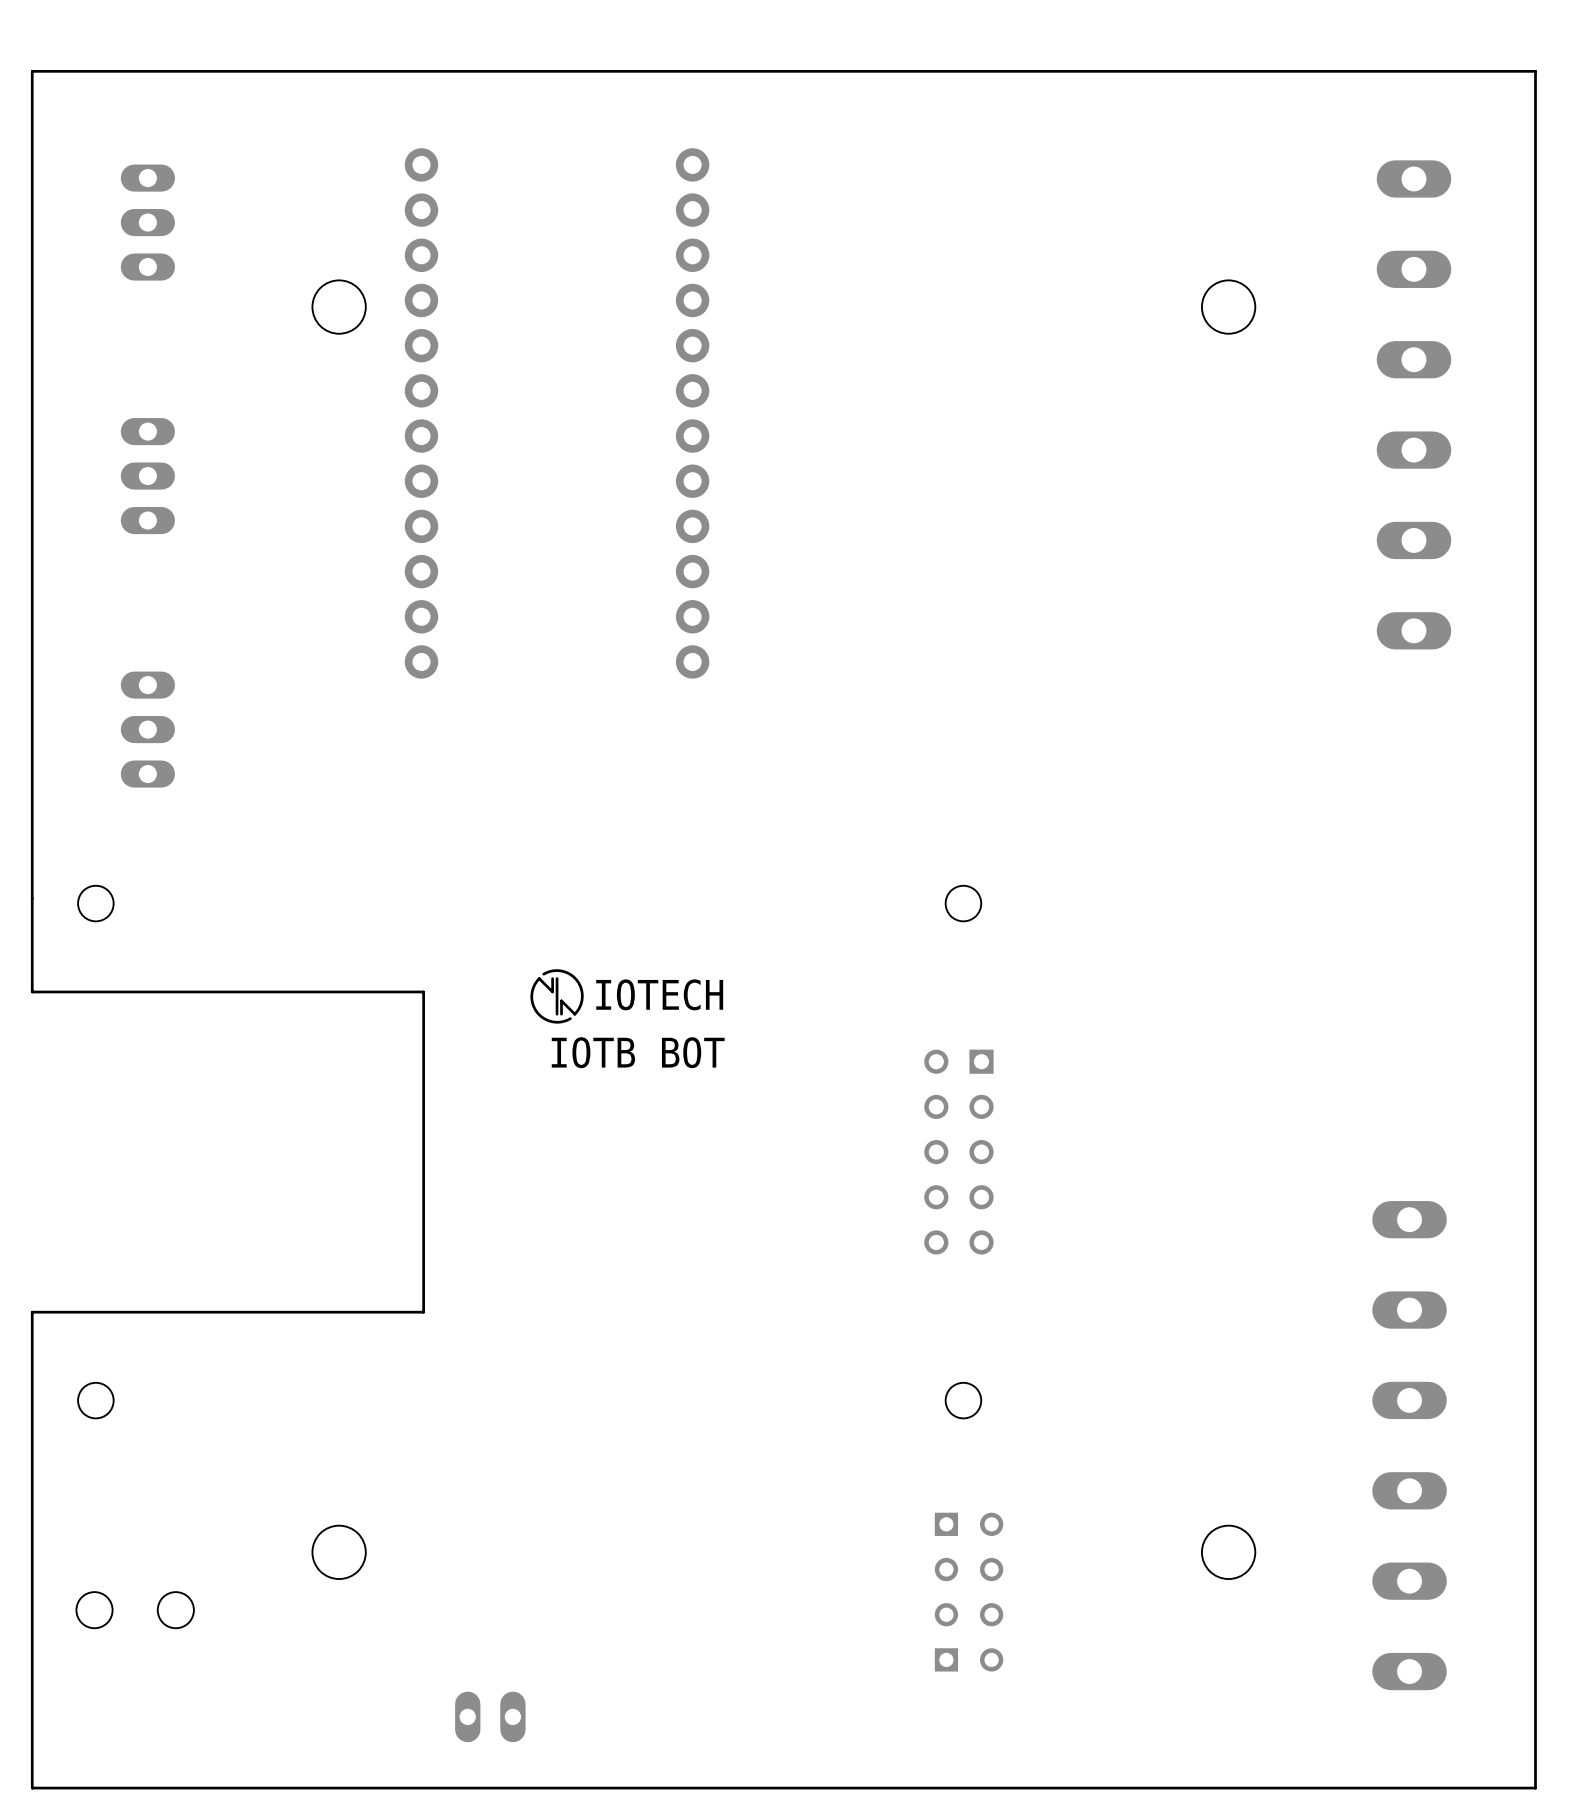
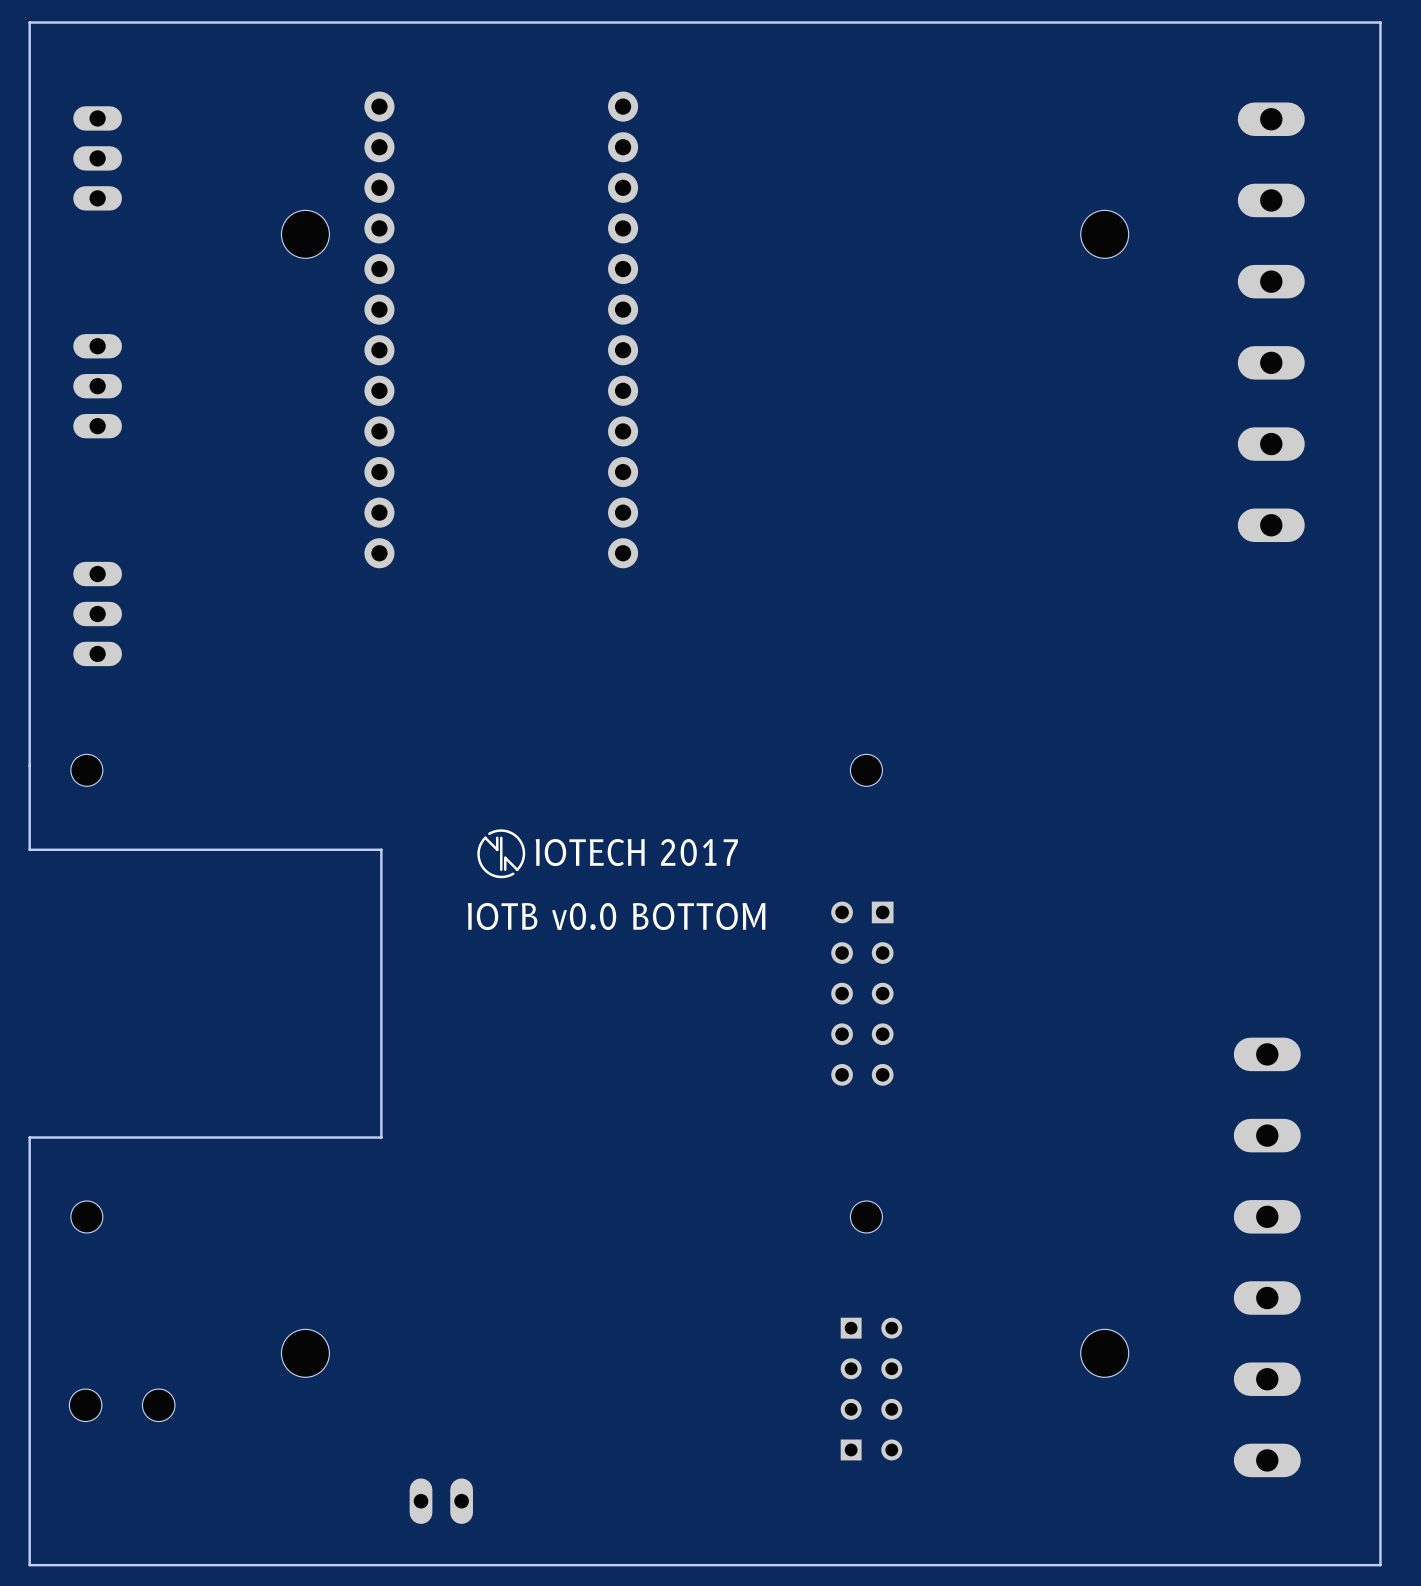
part position: (147, 222) -> (97, 158)
part position: (147, 476) -> (97, 386)
part position: (147, 729) -> (97, 613)
text: IOTECH (659, 994) -> IOTECH 2017 (636, 852)
text: IOTB BOT (638, 1052) -> IOTB v0.0 BOTTOM (616, 916)

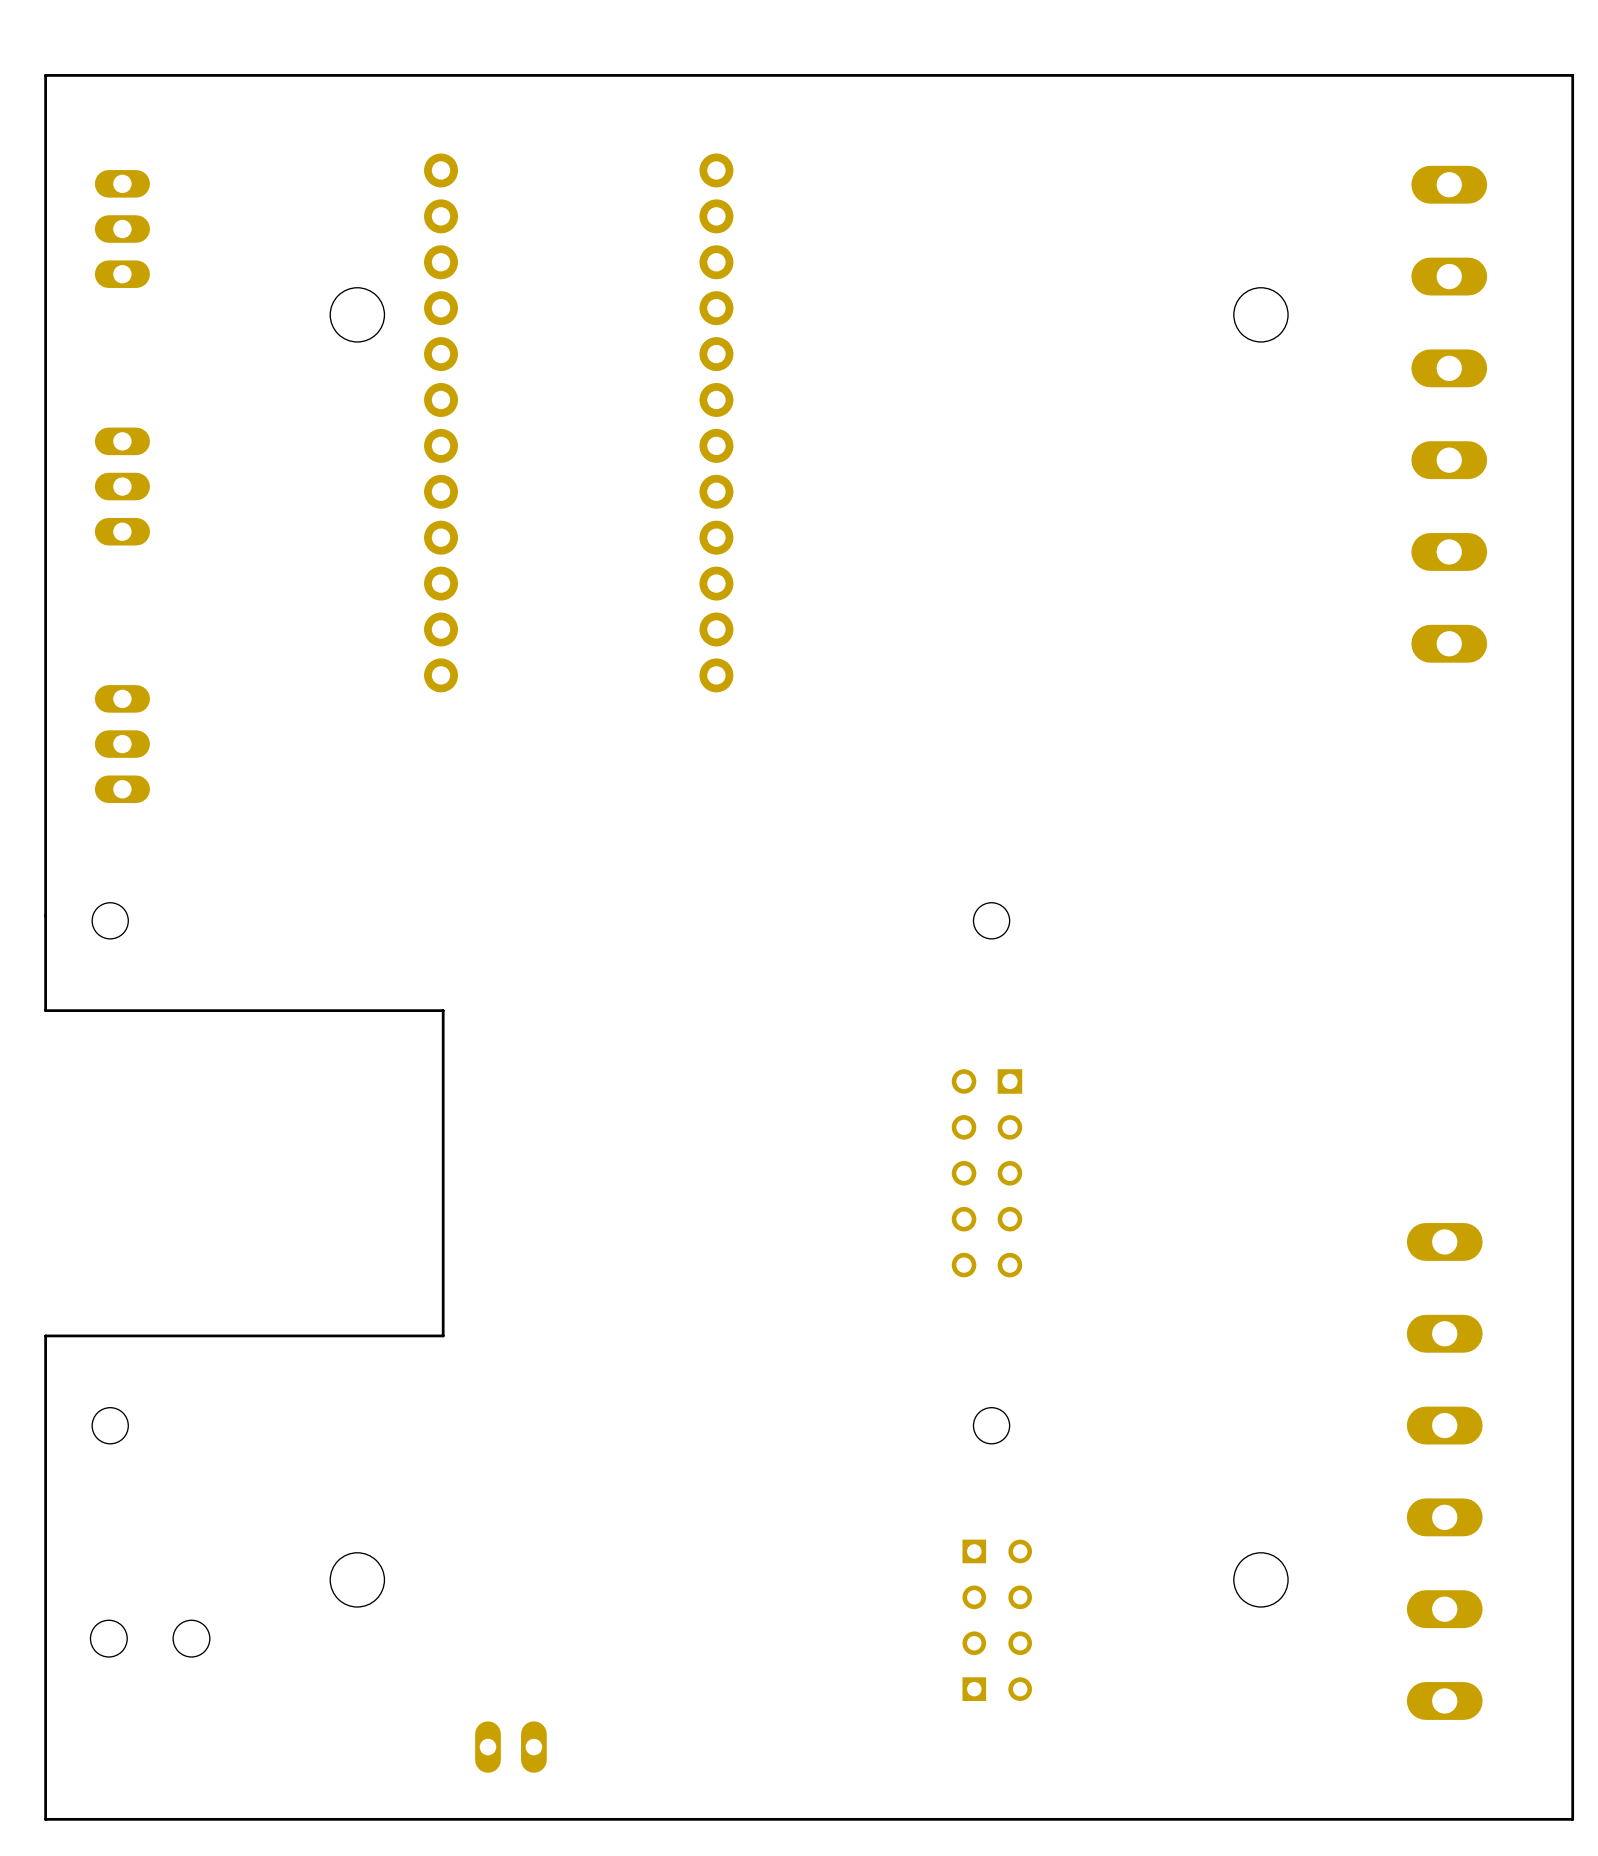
line: (489, 833) (497, 830) (507, 831) (515, 835) (522, 844) (523, 854) (520, 865) (517, 869) (505, 857) (505, 869) -> none
line: (497, 837) (497, 849) (485, 837) (481, 842) (478, 852) (480, 863) (487, 872) (494, 875) (505, 876) (513, 873) -> none
line: (501, 837) (501, 869) -> none
text: IOTECH 2017 (636, 852) -> none
text: IOTB v0.0 BOTTOM (616, 916) -> none

